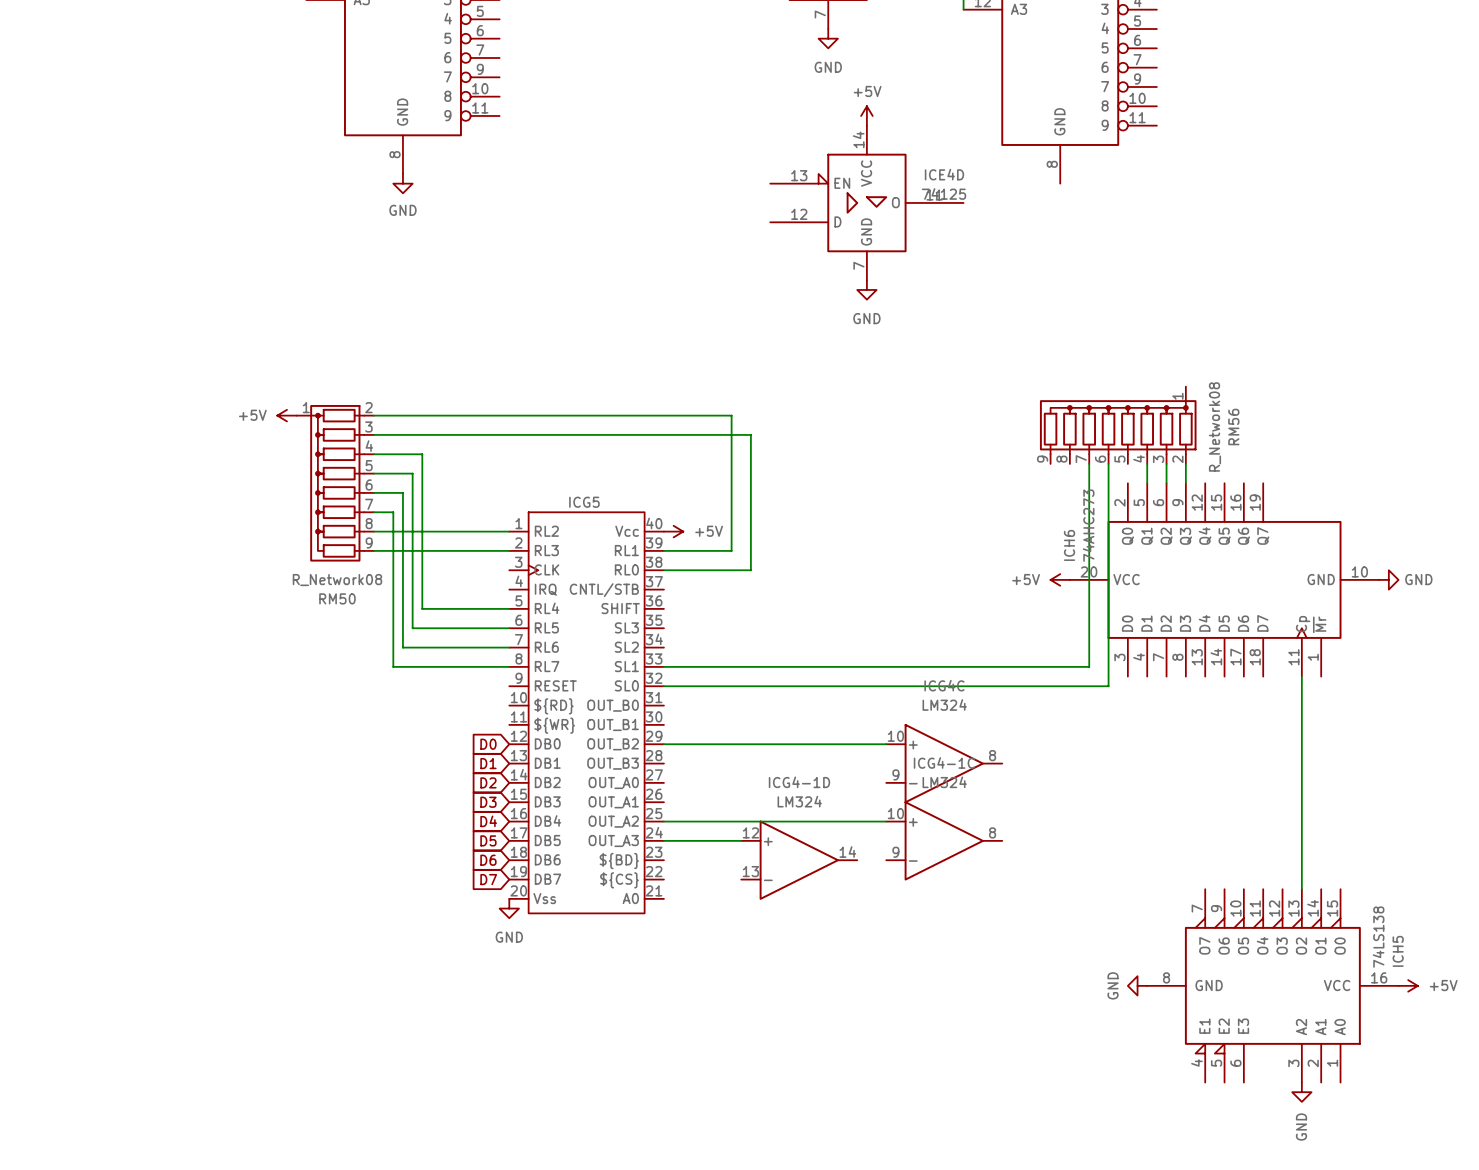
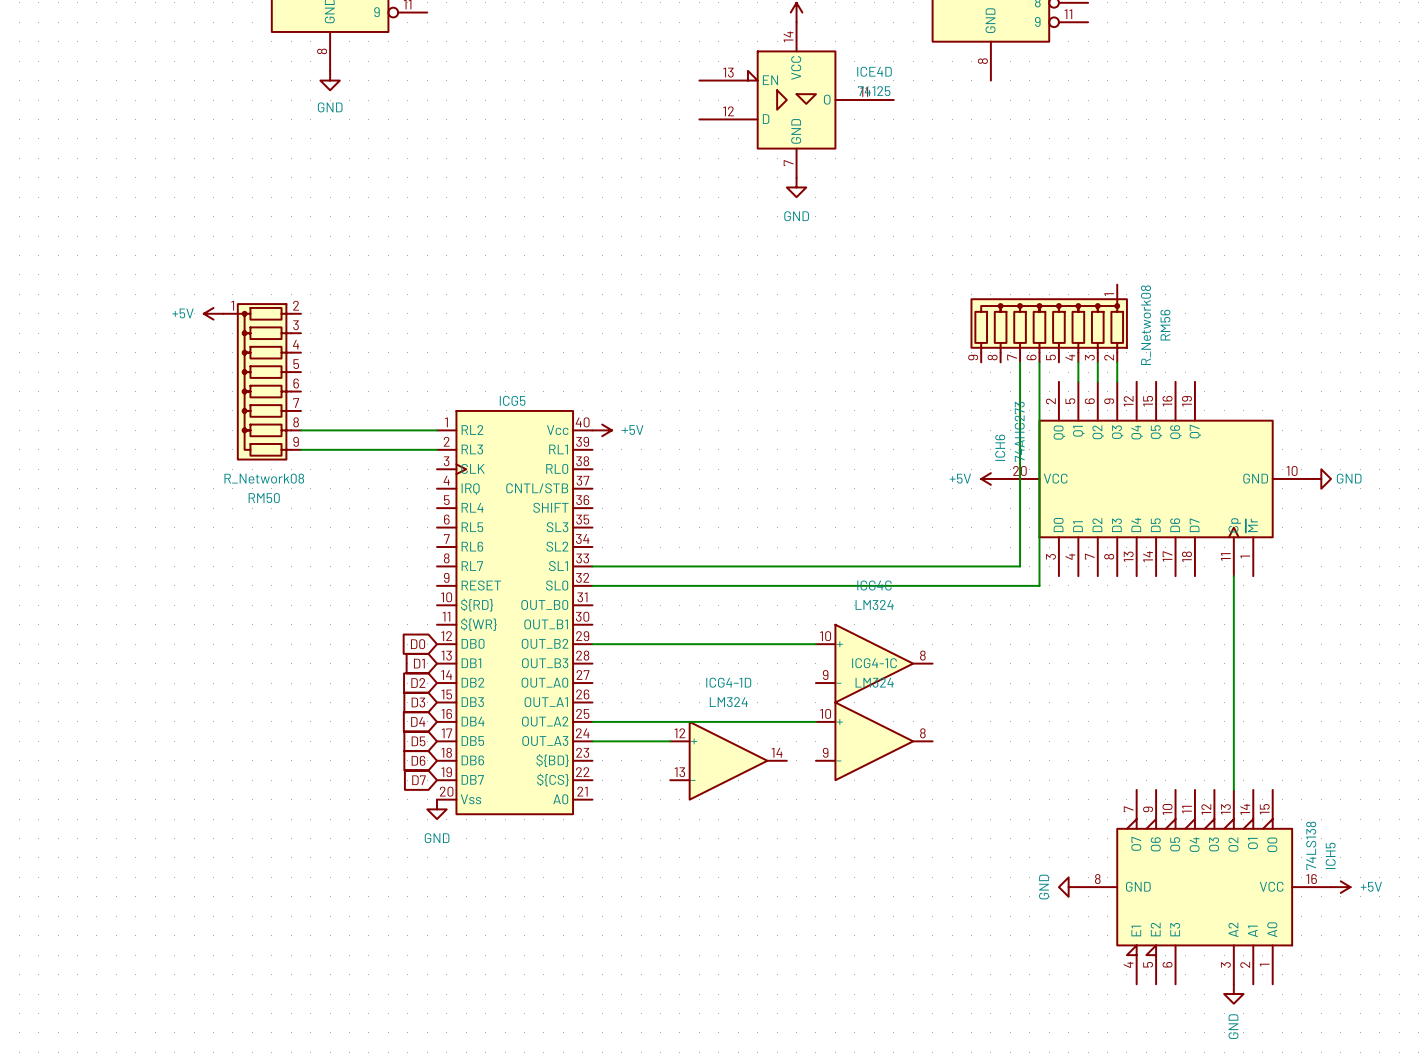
wire: (373, 415) (731, 415) (731, 550) (663, 550) -> none
wire: (373, 434) (750, 434) (750, 570) (663, 570) -> none
wire: (373, 454) (422, 454) (422, 608) (509, 608) -> none
wire: (373, 473) (412, 473) (412, 628) (509, 628) -> none
wire: (373, 492) (402, 492) (402, 647) (509, 647) -> none
wire: (373, 512) (393, 512) (393, 666) (509, 666) -> none

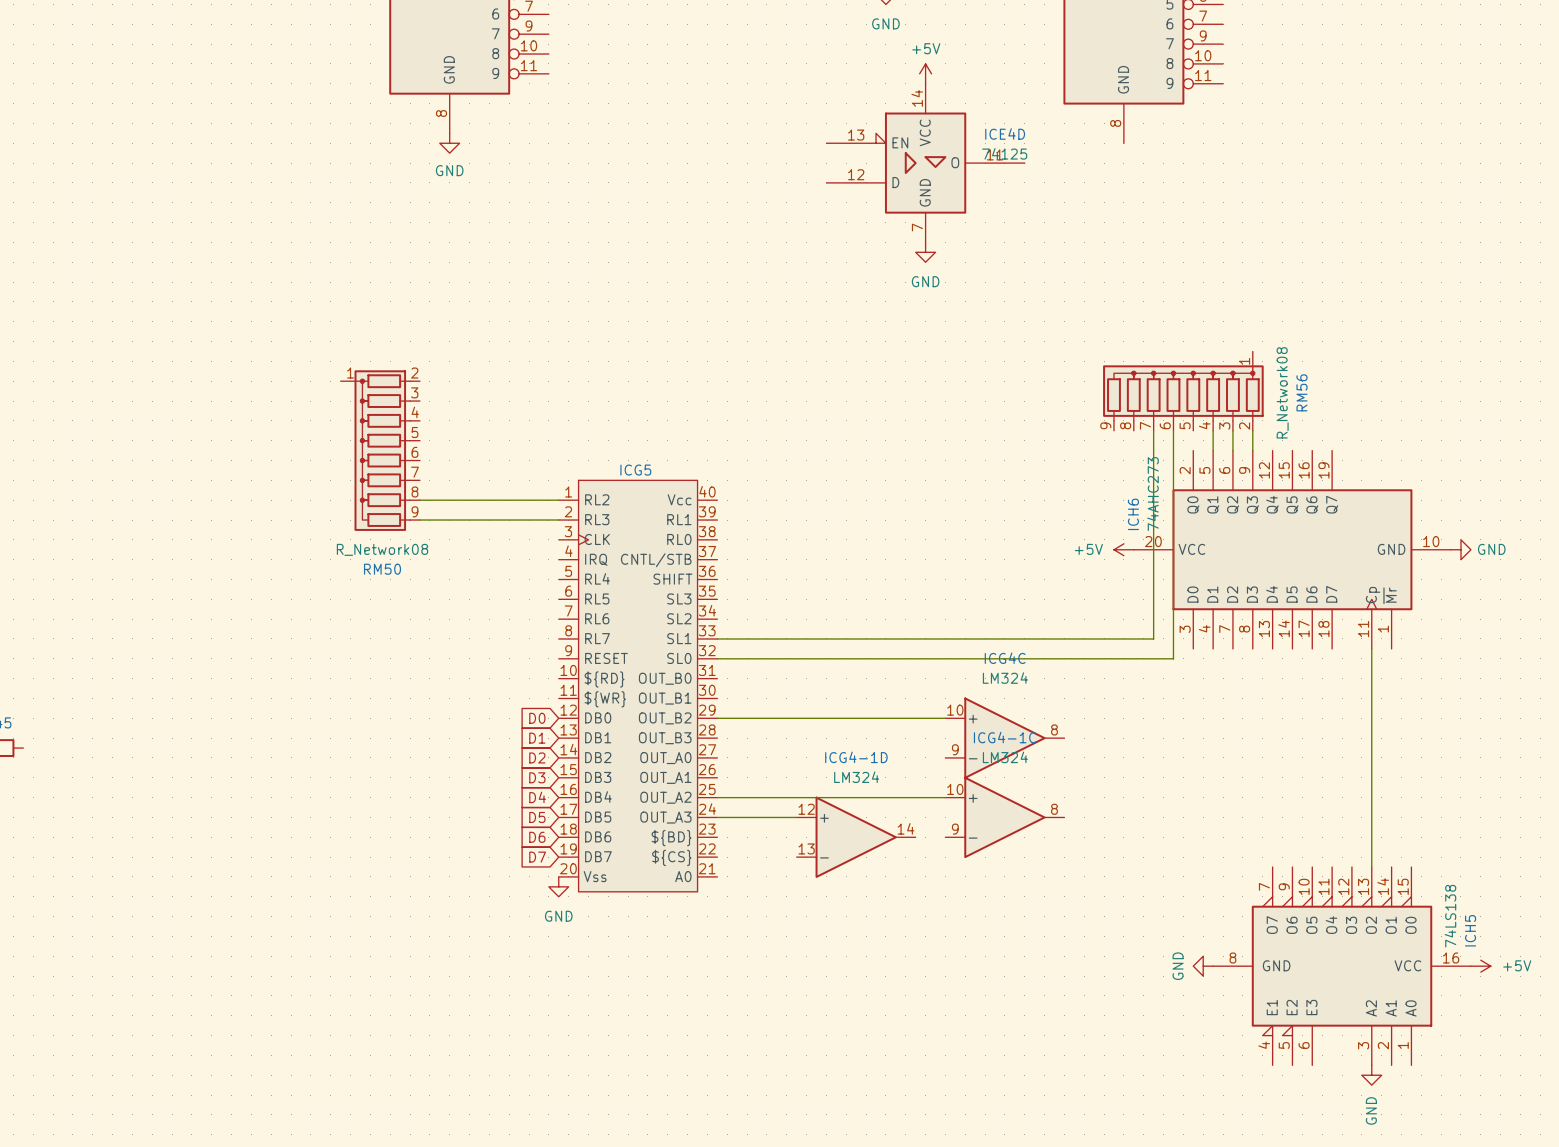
power symbol: +5V (213, 313) -> none
power symbol: +5V (602, 430) -> none

